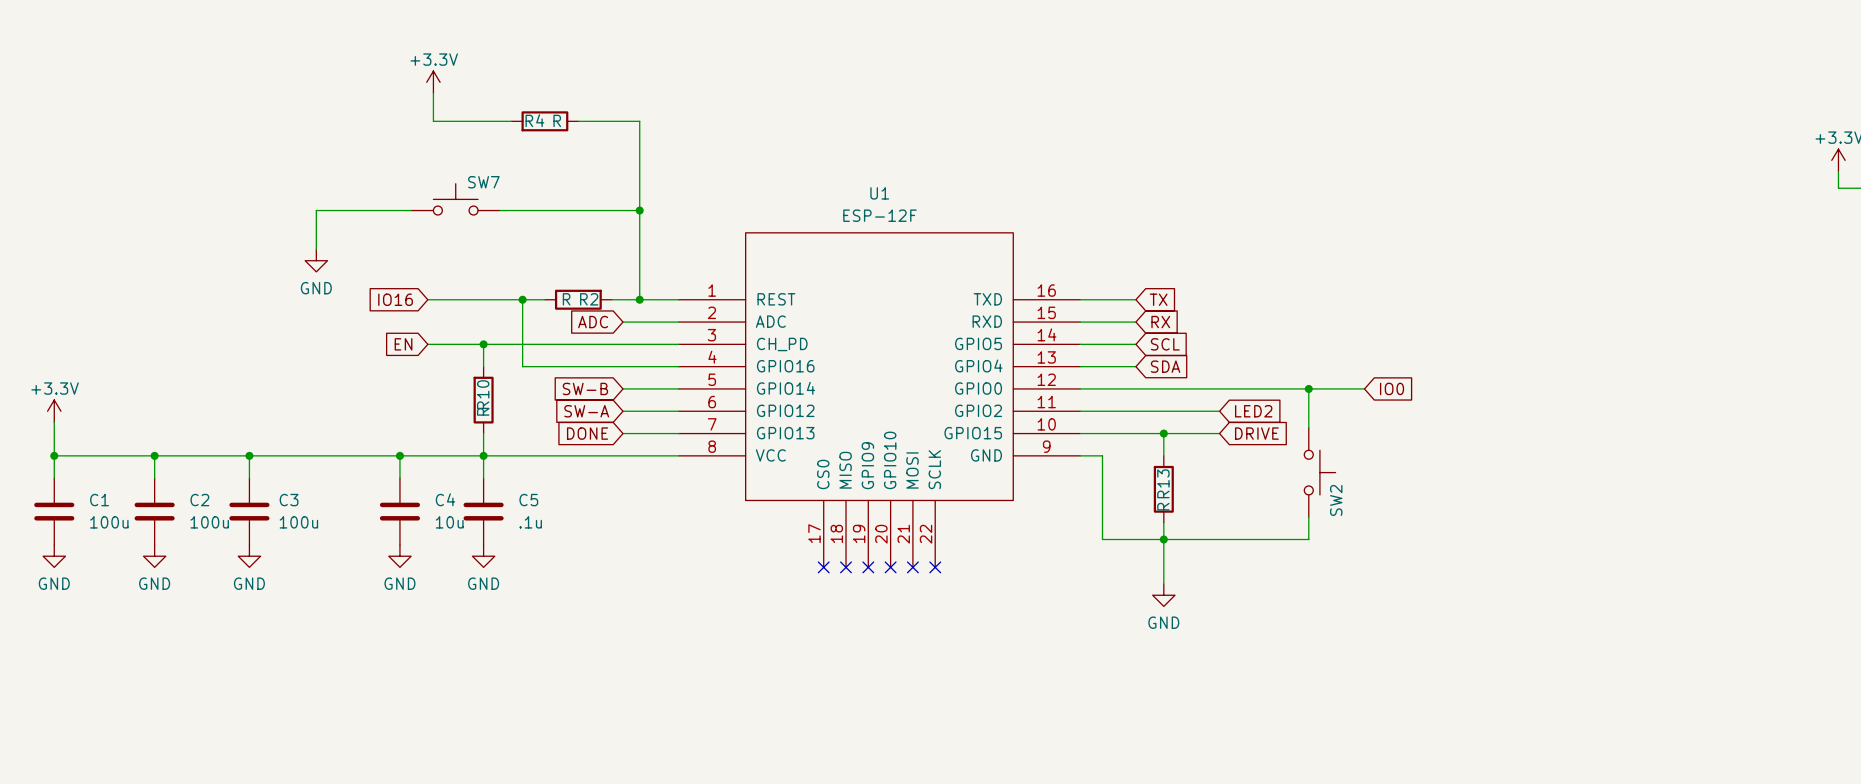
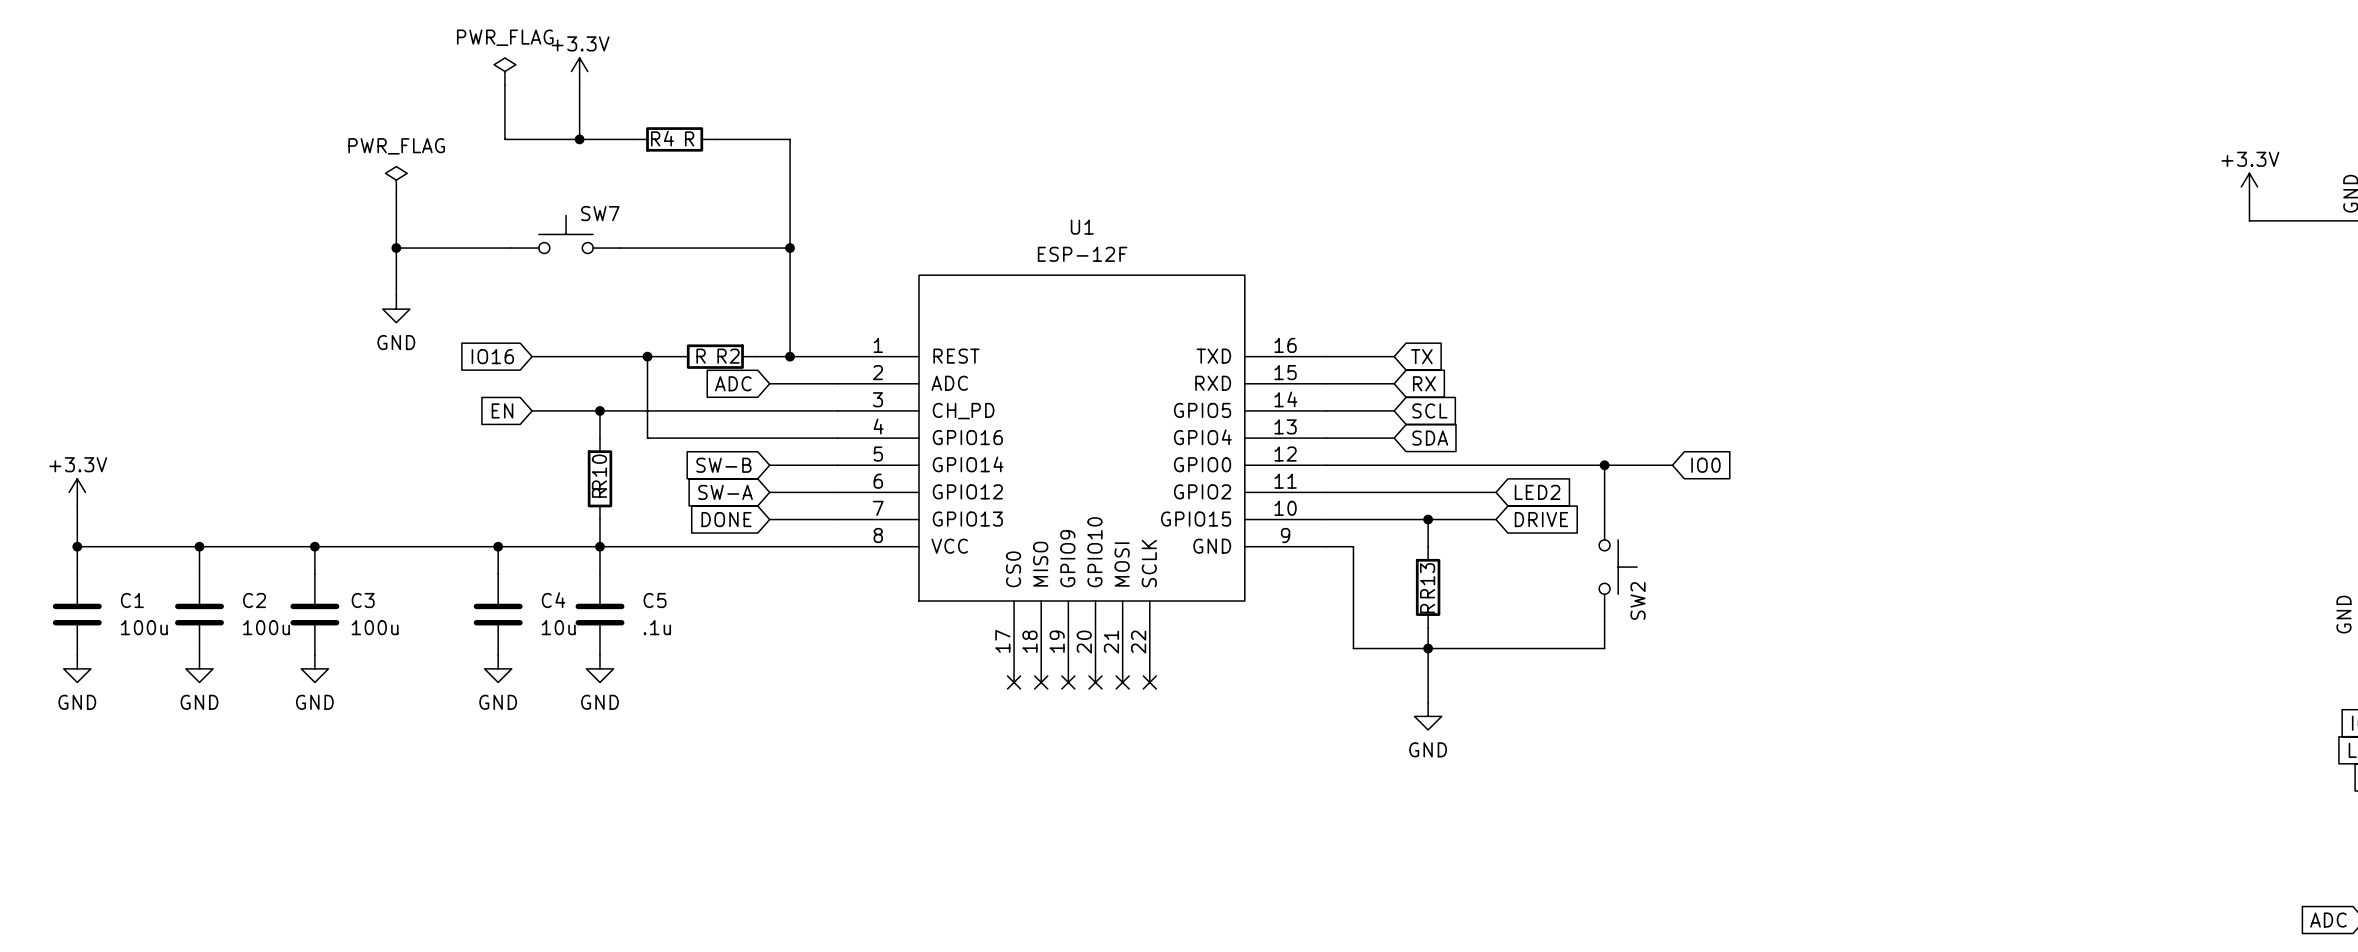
power symbol: none -> PWR_FLAG (504, 71)
wire: none -> (579, 85) (579, 139)
power symbol position: +3.3V (433, 82) -> +3.3V (579, 71)
wire: (433, 93) (433, 121) -> (504, 85) (504, 139) (538, 139)
junction: none -> (579, 139)
power symbol: none -> PWR_FLAG (396, 180)
wire: none -> (396, 193) (396, 248)
junction: none -> (396, 248)

